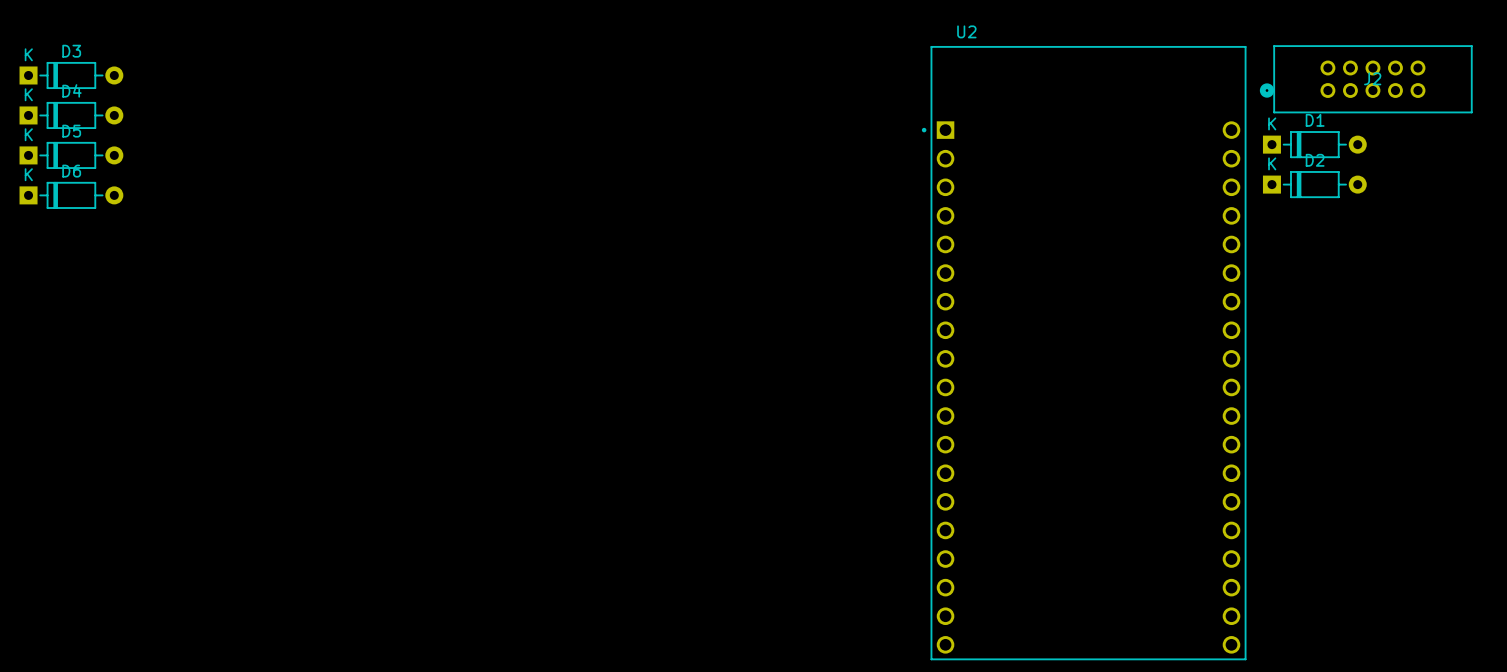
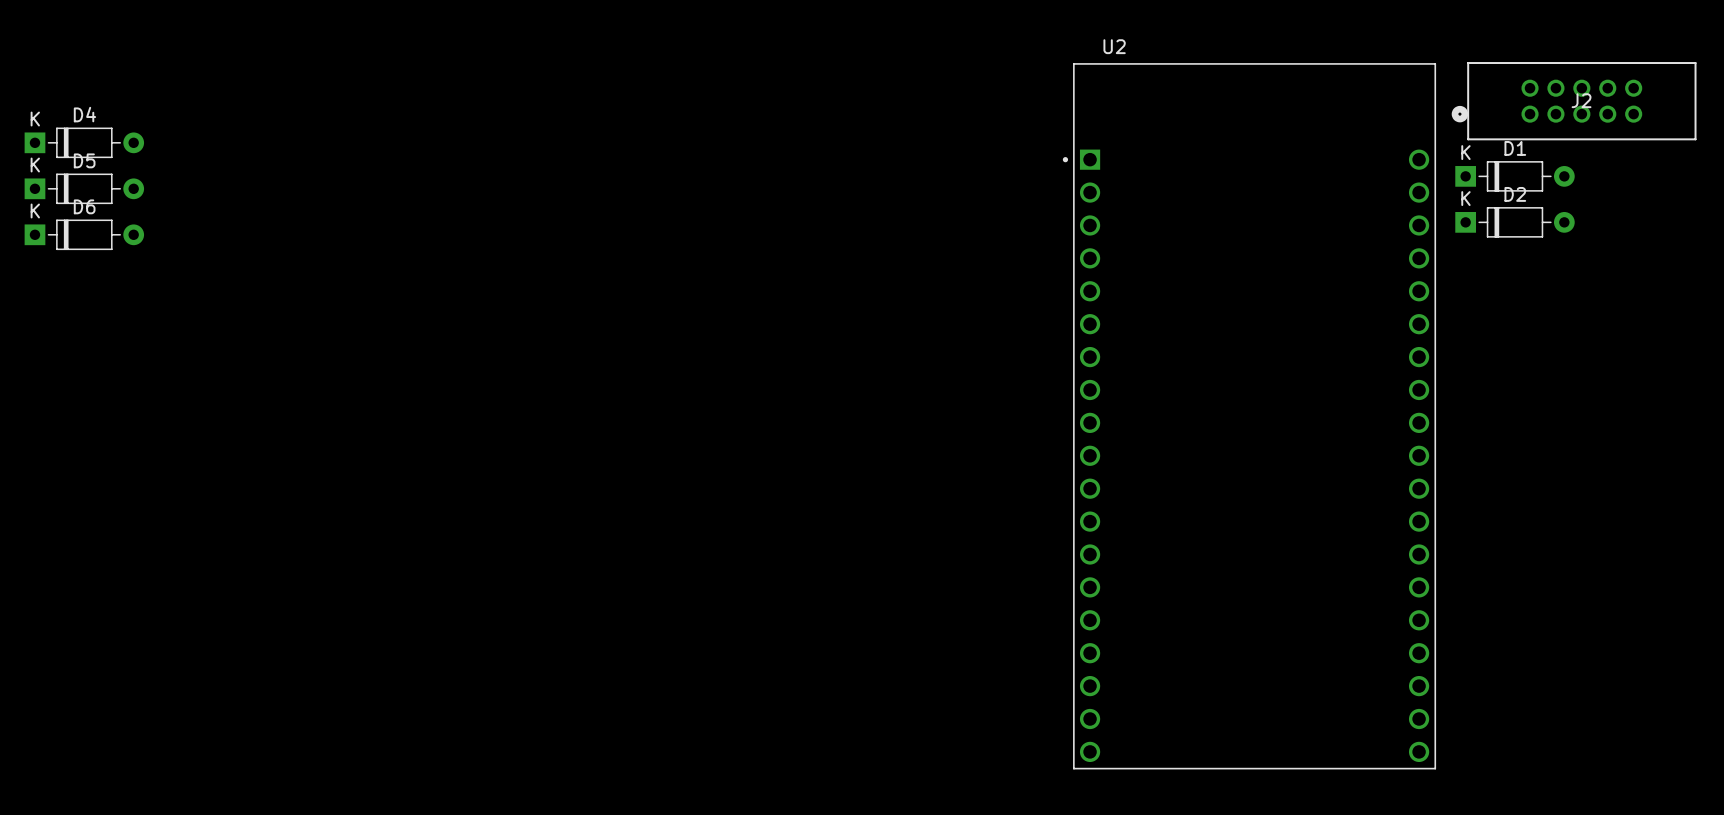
D3: (71, 75) -> none

